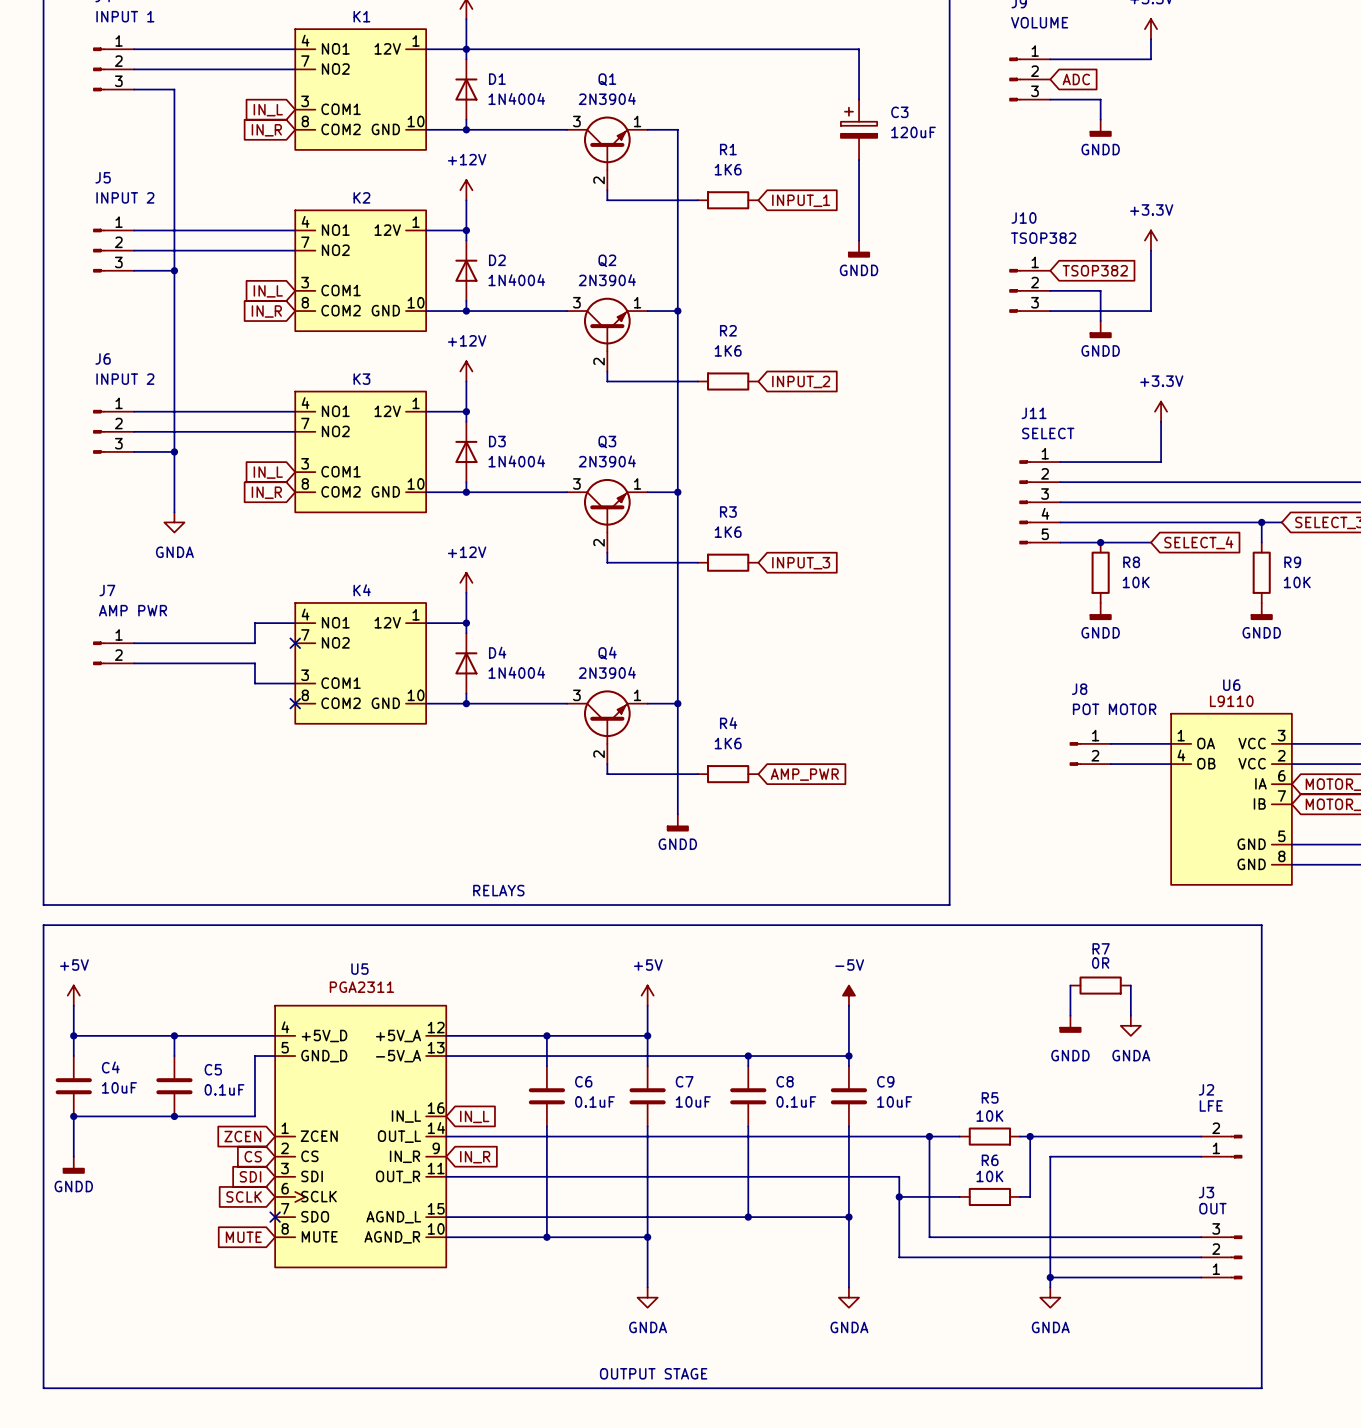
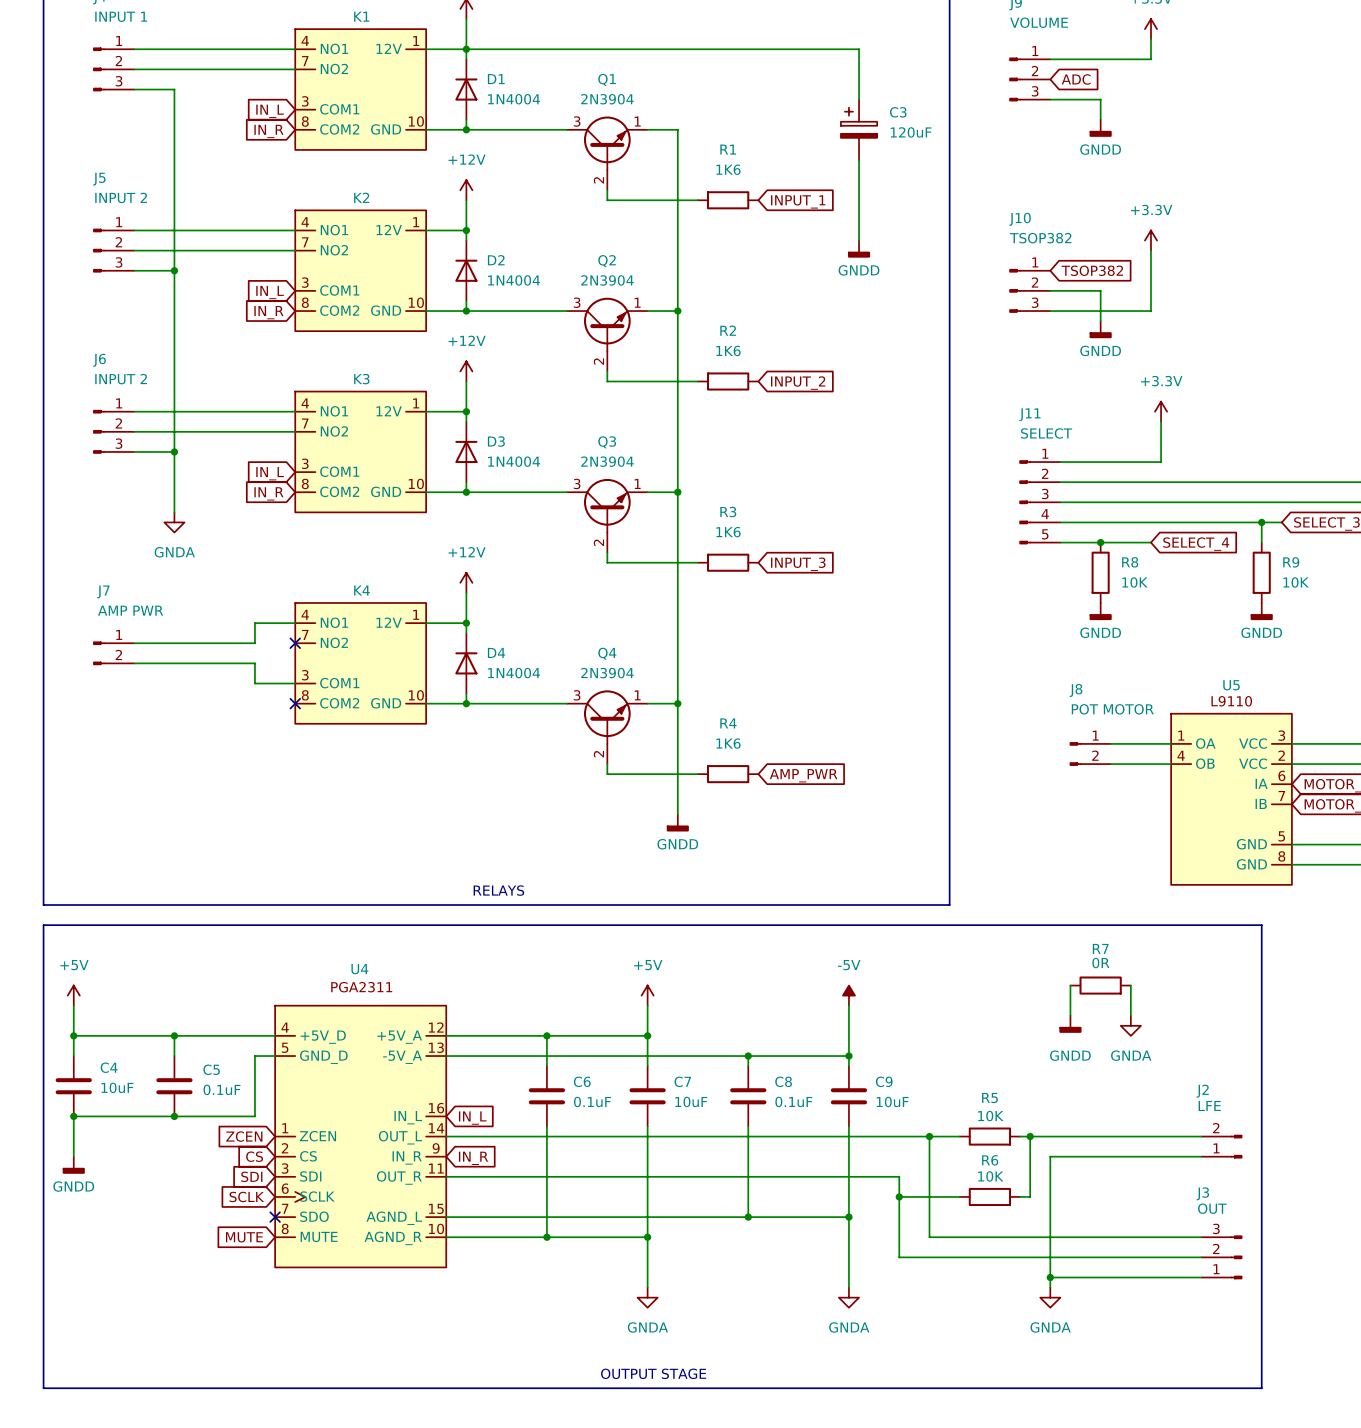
U6 name: U6 (1231, 685) -> U5 (1231, 685)
U5 name: U5 (359, 969) -> U4 (359, 969)

